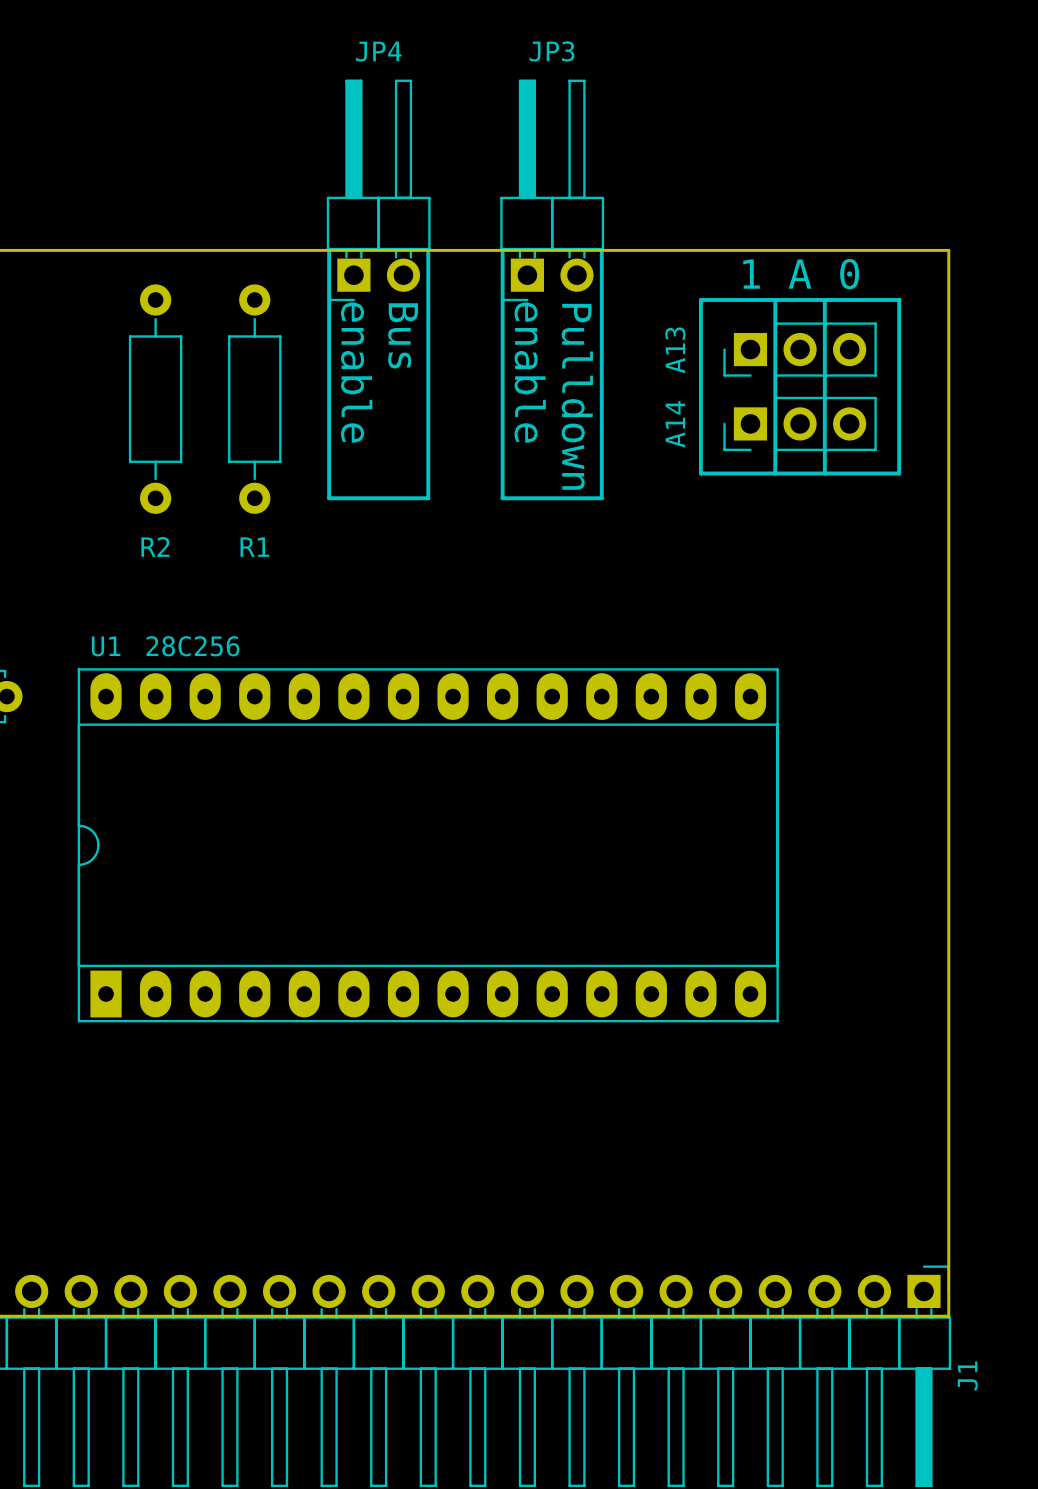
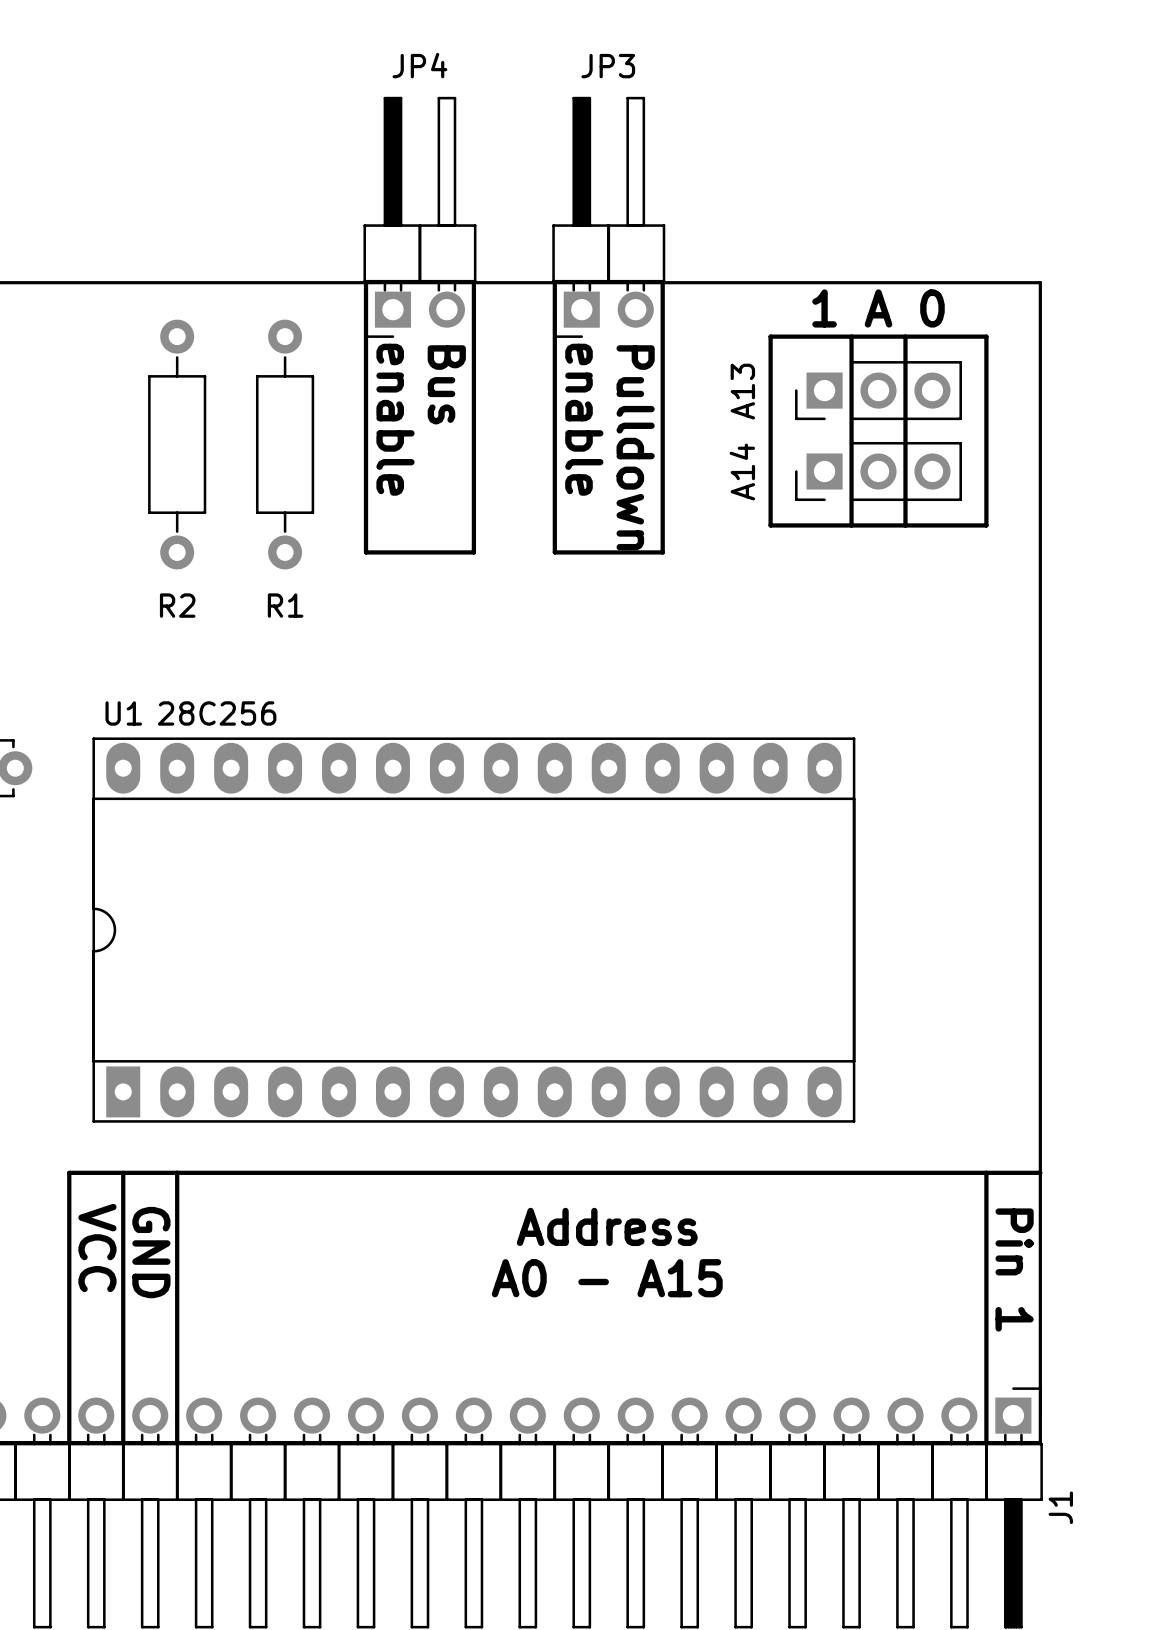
line: none -> (123, 1172) (123, 1442)
line: none -> (177, 1172) (177, 1442)
line: none -> (986, 1172) (986, 1442)
line: none -> (1040, 1172) (69, 1172) (69, 1442)
text: none -> Address (607, 1226)
text: none -> VCC (97, 1247)
text: none -> GND (151, 1252)
text: none -> Pin 1 (1014, 1269)
text: none -> A0 - A15 (607, 1278)

